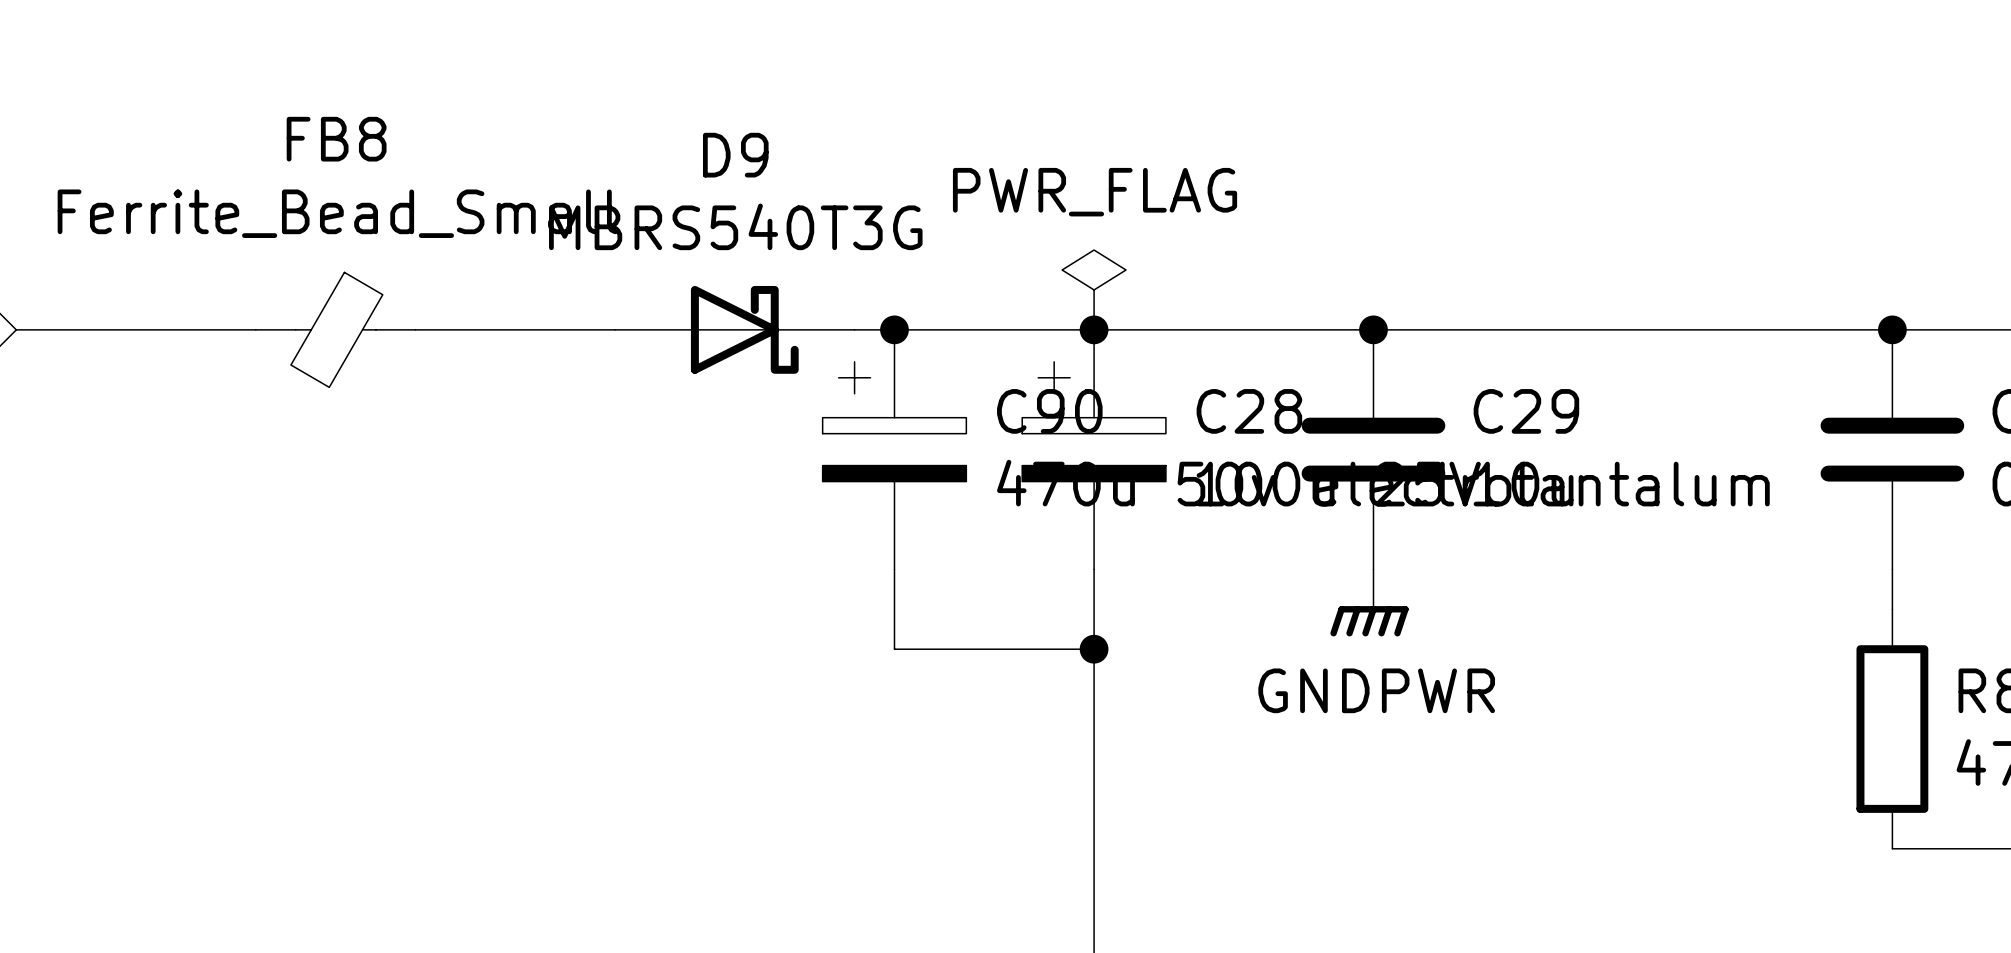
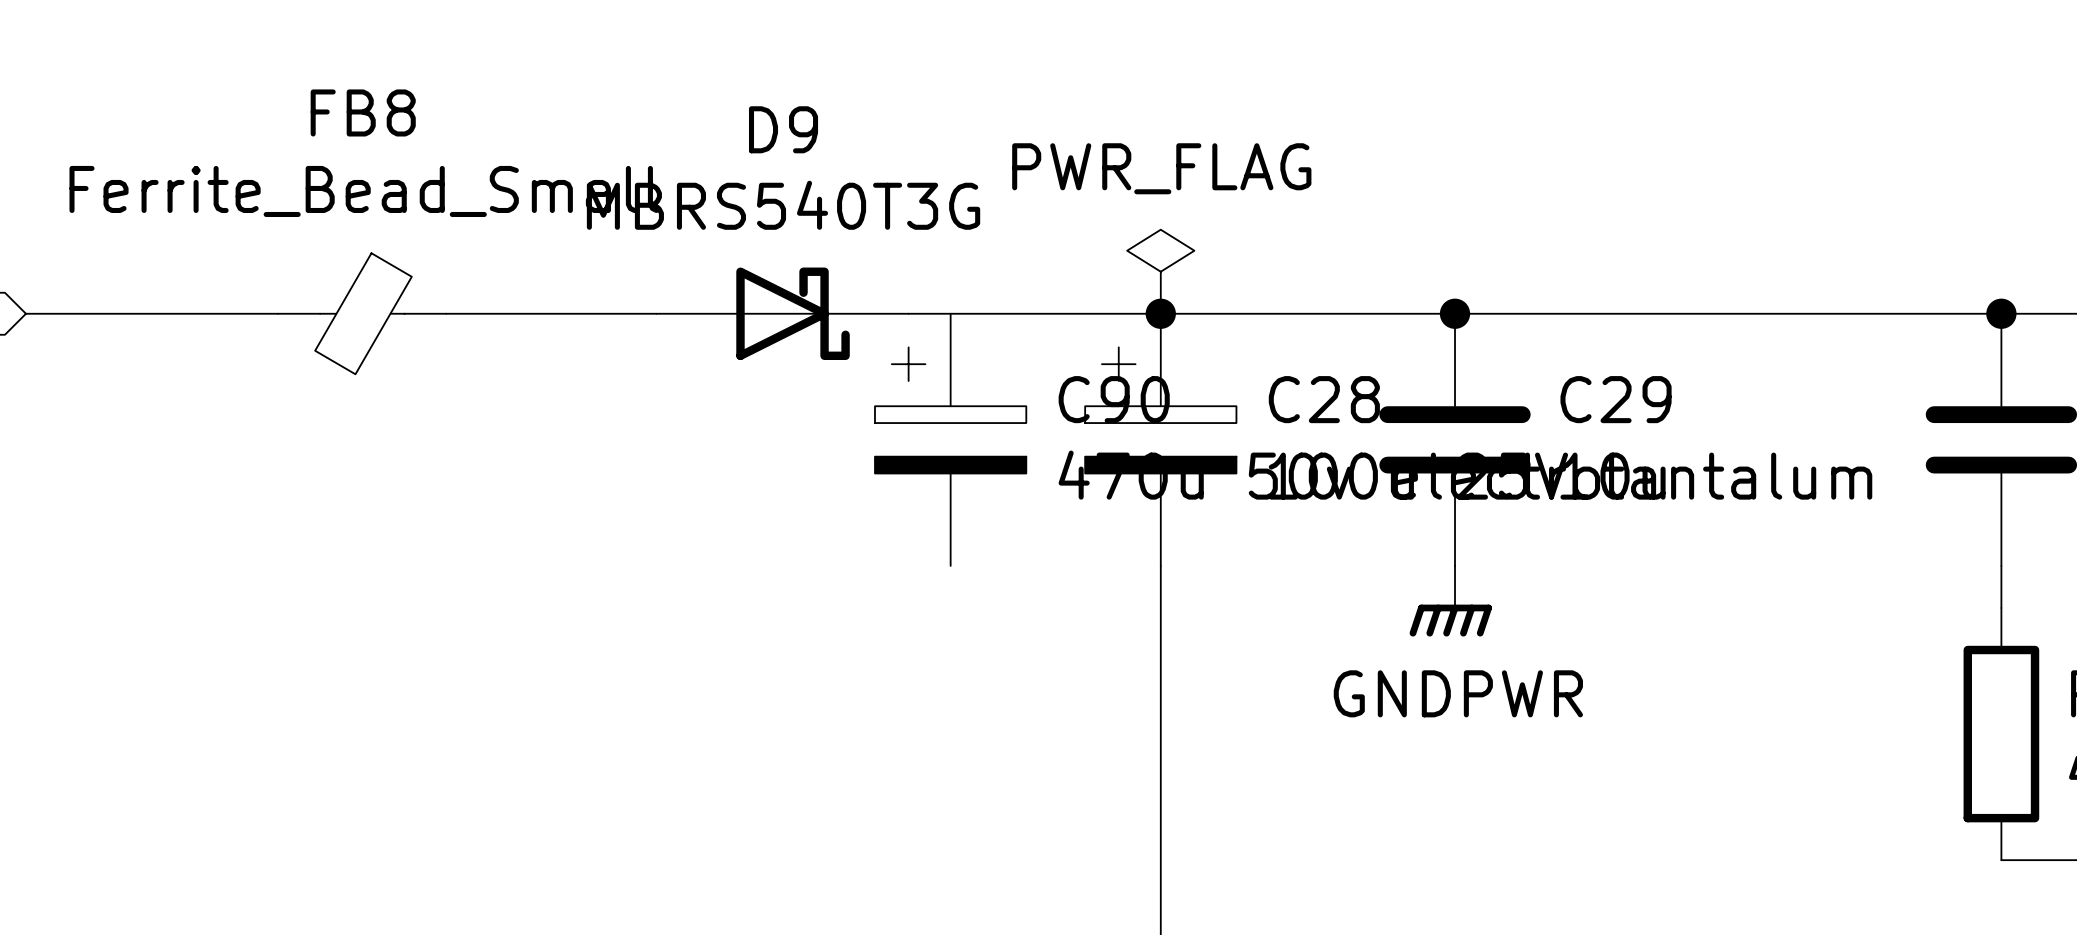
junction: (894, 329) -> none
wire: (894, 569) (894, 649) (1094, 649) -> none
junction: (1094, 649) -> none

